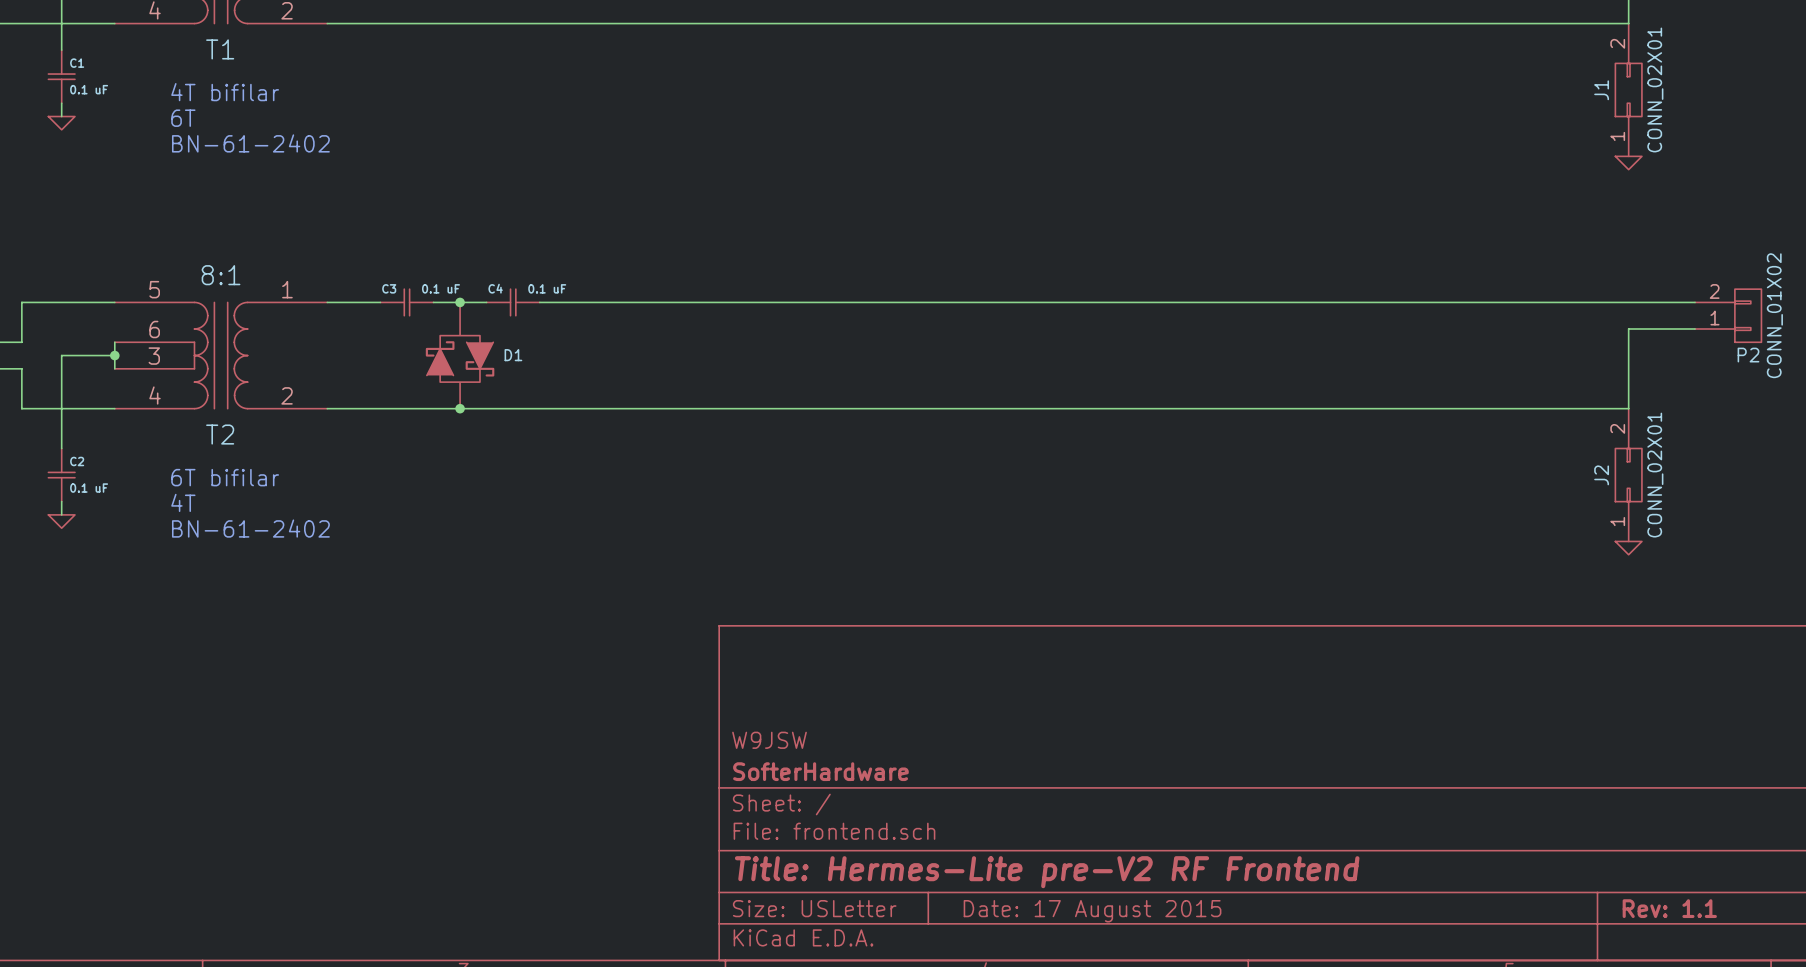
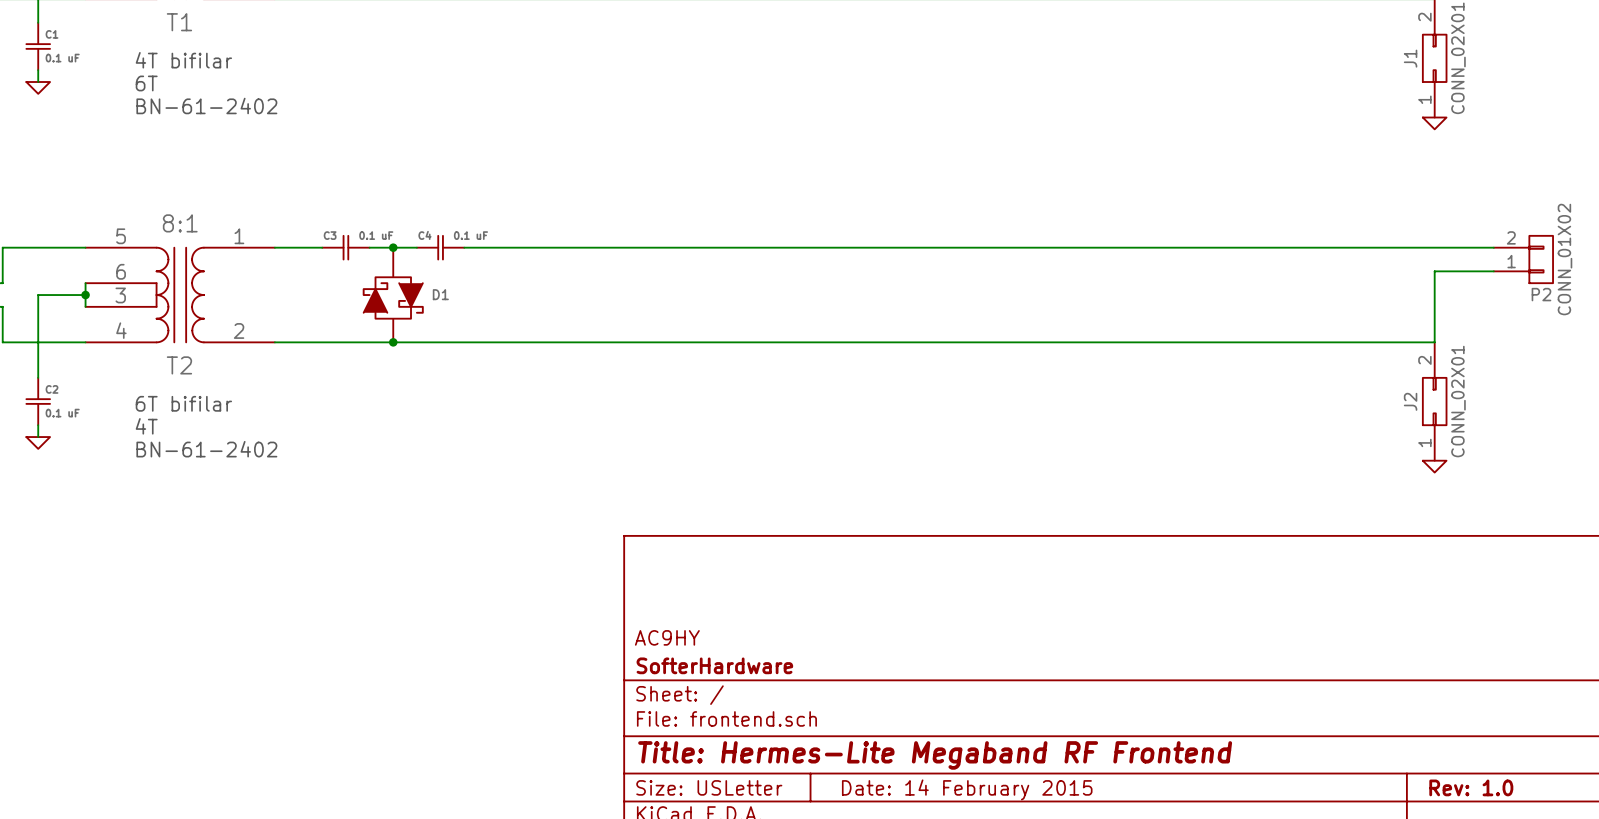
title block: W9JSW (769, 740) -> AC9HY (667, 637)
title block: Title: Hermes-Lite pre-V2 RF Frontend (1047, 872) -> Title: Hermes-Lite Megaband RF Frontend (935, 755)
title block: Rev: 1.1 (1669, 908) -> Rev: 1.0 (1471, 787)
title block: Date: 17 August 2015 (1092, 911) -> Date: 14 February 2015 (967, 789)

